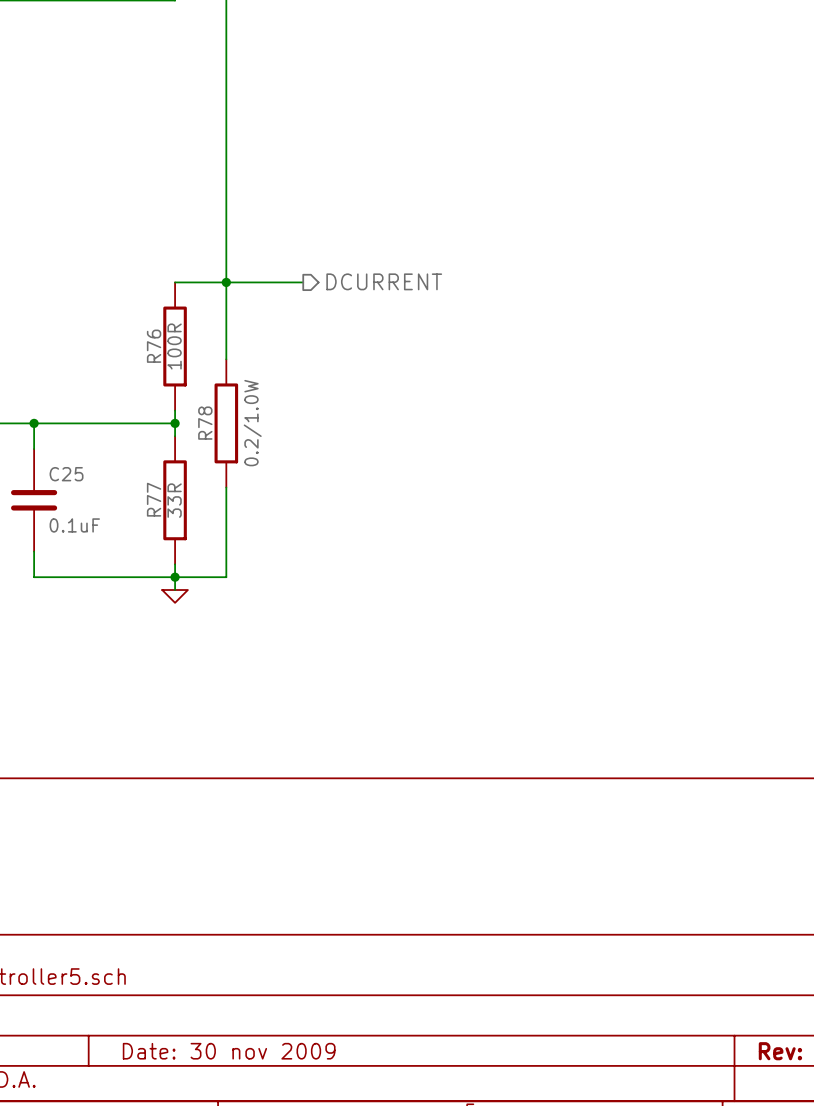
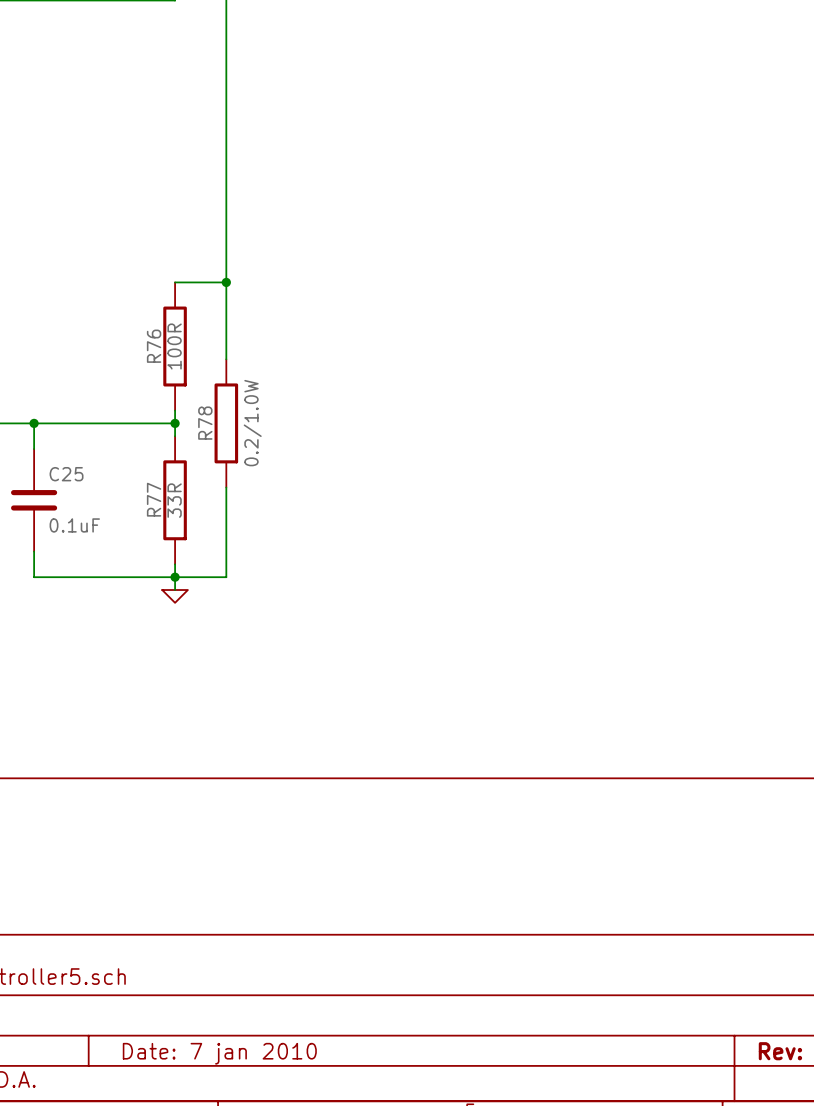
hierarchical label: DCURRENT (384, 281) -> none
wire: (226, 282) (303, 282) -> none
title block: Date: 30 nov 2009 (229, 1051) -> Date: 7 jan 2010 (219, 1053)

